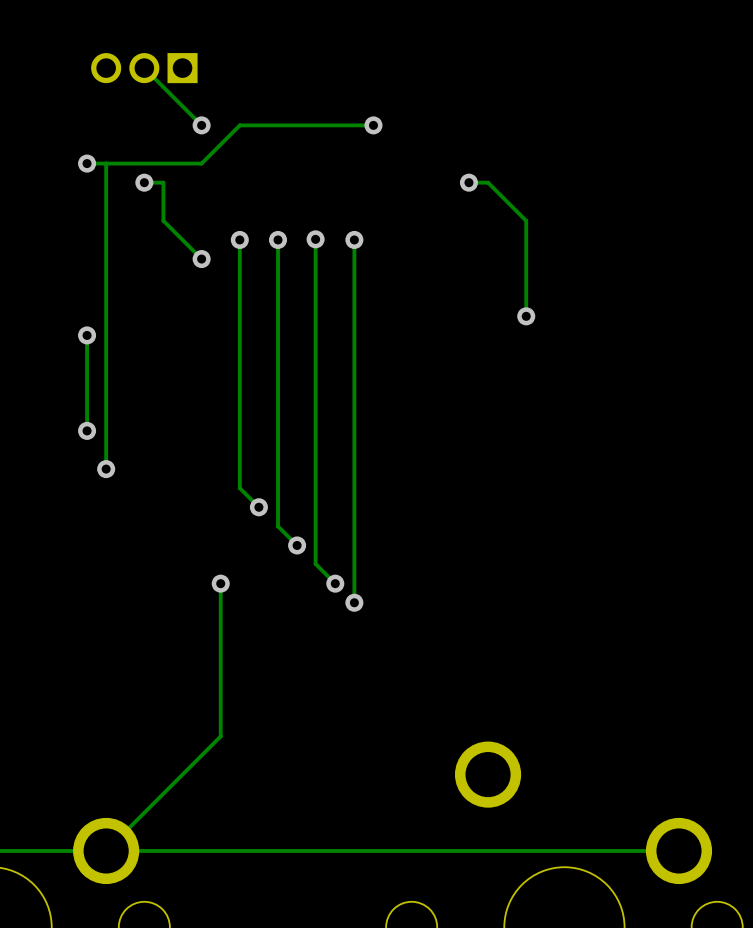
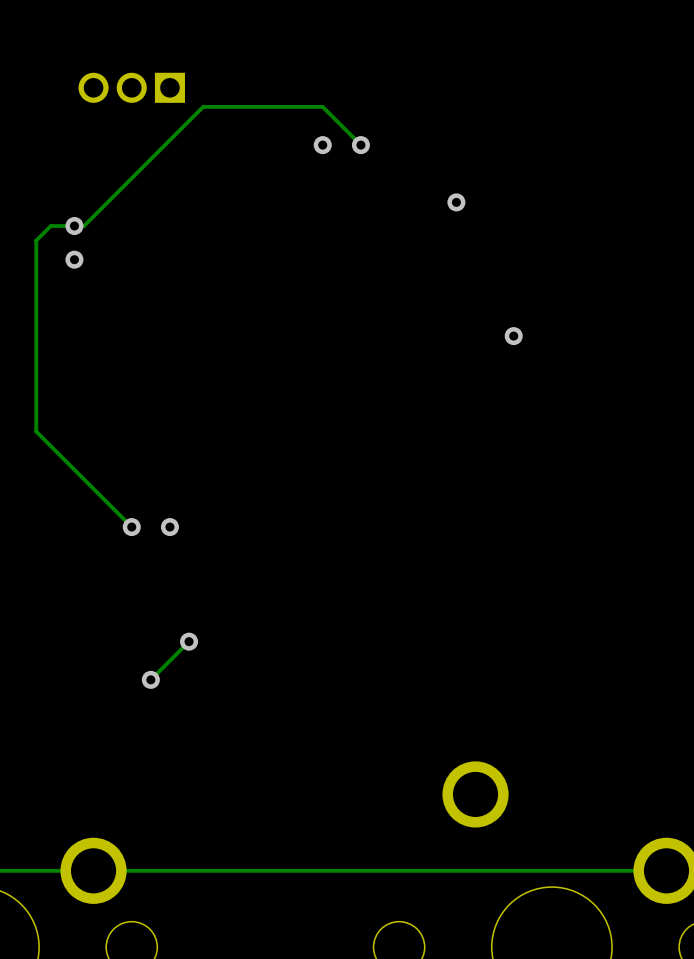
track: (144, 68) (201, 125) -> none
via: (201, 125) -> none
via: none -> (322, 145)
track: (373, 125) (239, 125) (201, 163) (87, 163) -> (360, 145) (322, 106) (203, 106) (84, 226) (50, 226) (36, 240) (36, 431) (131, 527)
via: (87, 163) -> none
track: (106, 163) (106, 469) -> none
track: (144, 182) (163, 182) (163, 220) (201, 259) -> none
via: (144, 182) -> none
track: (468, 182) (488, 182) (526, 220) (526, 316) -> none
via: none -> (74, 226)
via: none -> (74, 259)
track: (239, 239) (239, 488) (258, 507) -> none
via: (239, 239) -> none
track: (278, 239) (278, 526) (297, 545) -> none
via: (278, 239) -> none
track: (315, 239) (315, 563) (335, 583) -> none
via: (315, 239) -> none
track: (354, 239) (354, 602) -> none
via: (354, 239) -> none
via: (201, 259) -> none
track: (87, 335) (87, 430) -> none
via: (87, 335) -> none
via: (87, 430) -> none
via: (106, 469) -> none
via: none -> (131, 527)
via: none -> (169, 527)
via: (258, 507) -> none
via: (297, 545) -> none
track: (220, 583) (220, 736) (106, 850) -> none
via: (220, 583) -> none
via: (335, 583) -> none
via: (354, 602) -> none
track: none -> (189, 641) (150, 679)
via: none -> (189, 641)
via: none -> (150, 679)

